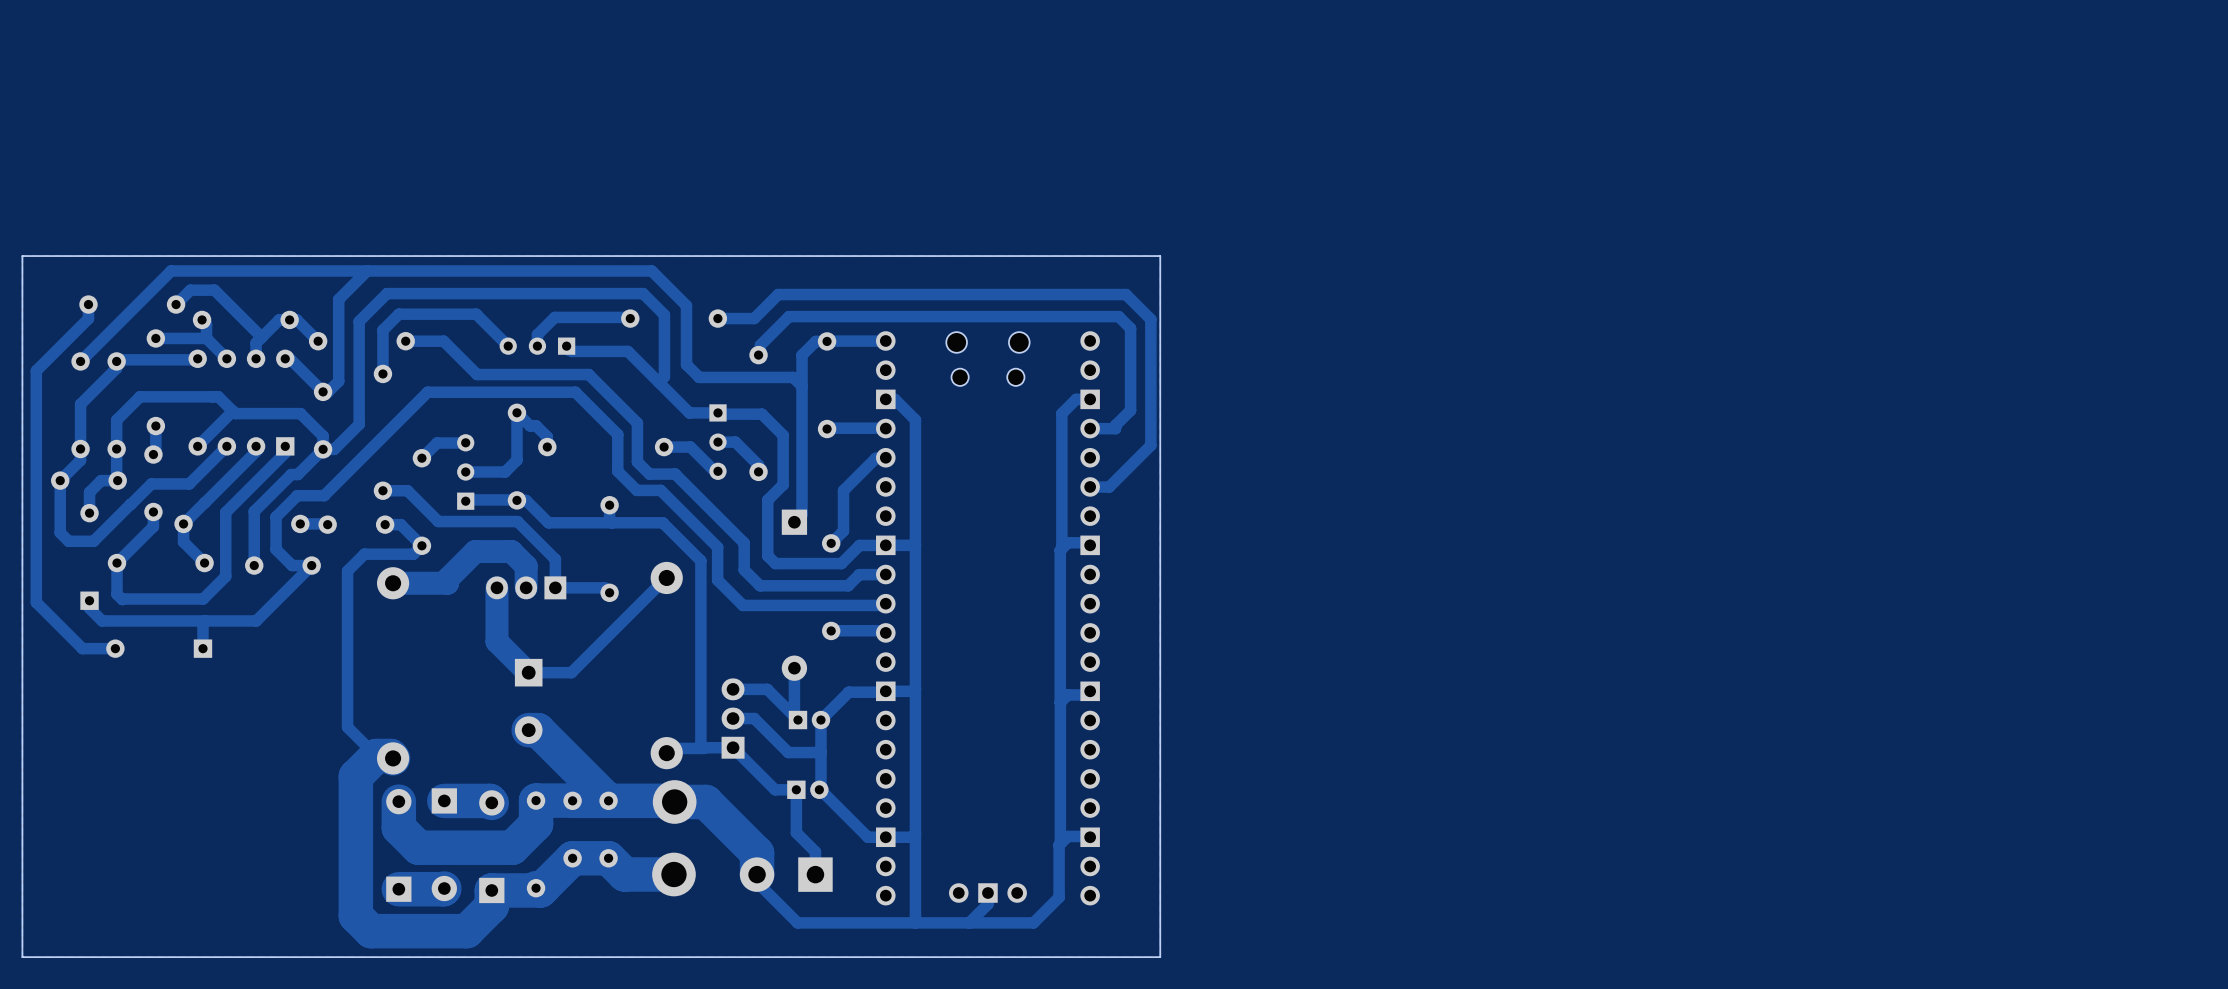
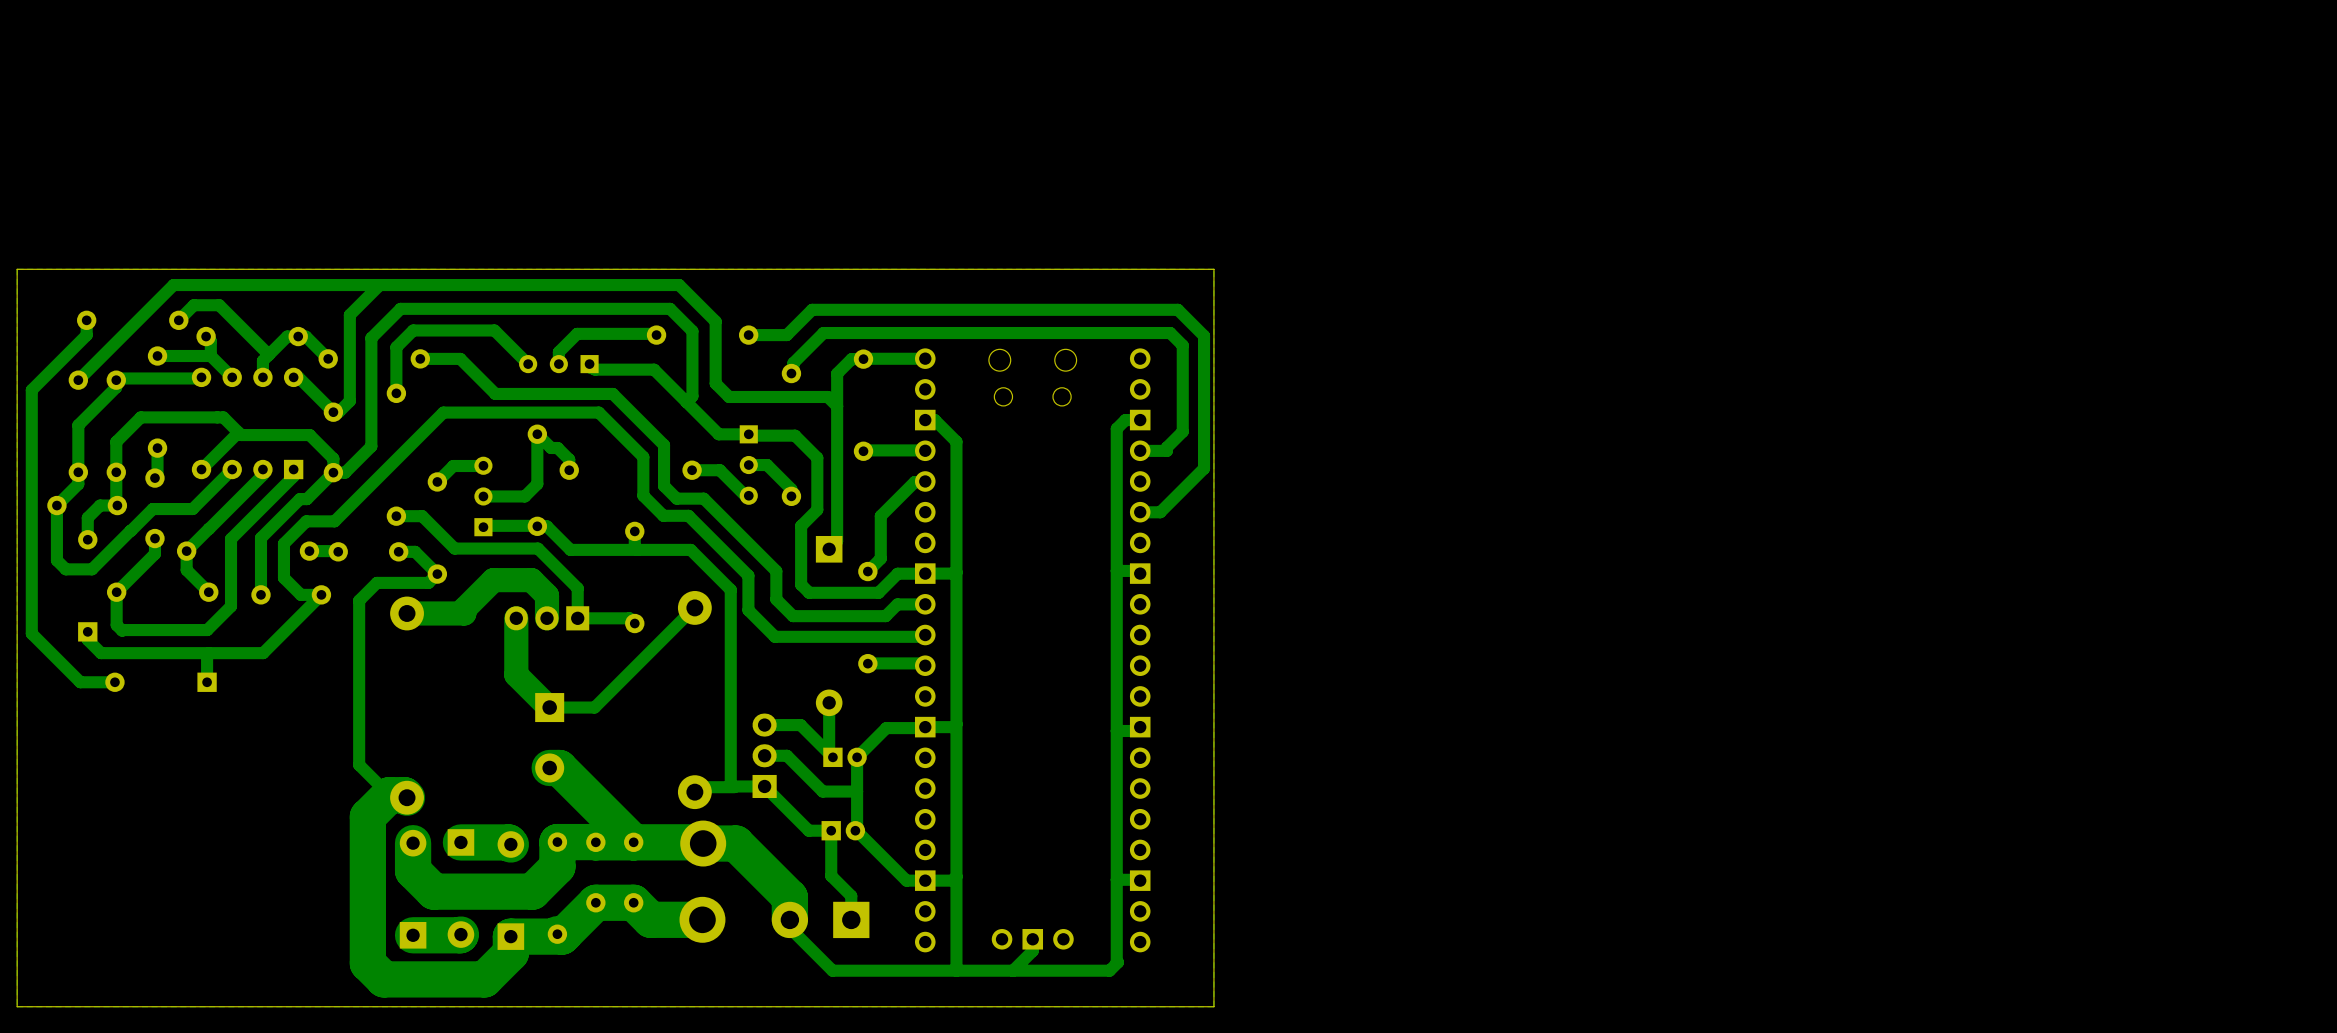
track: (1067, 407) (1061, 413) (1061, 548) -> (1116, 428) (1117, 962) (1109, 970) (1080, 970)
track: (1067, 542) (1060, 550) (1060, 702) -> none
track: (1067, 694) (1060, 702) (1060, 843) -> none
track: (1067, 836) (1059, 845) (1059, 897) (1033, 922) -> none

